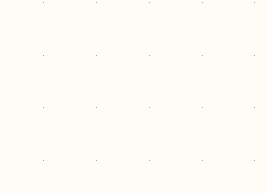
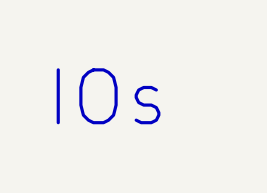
text: none -> IOs (108, 96)

